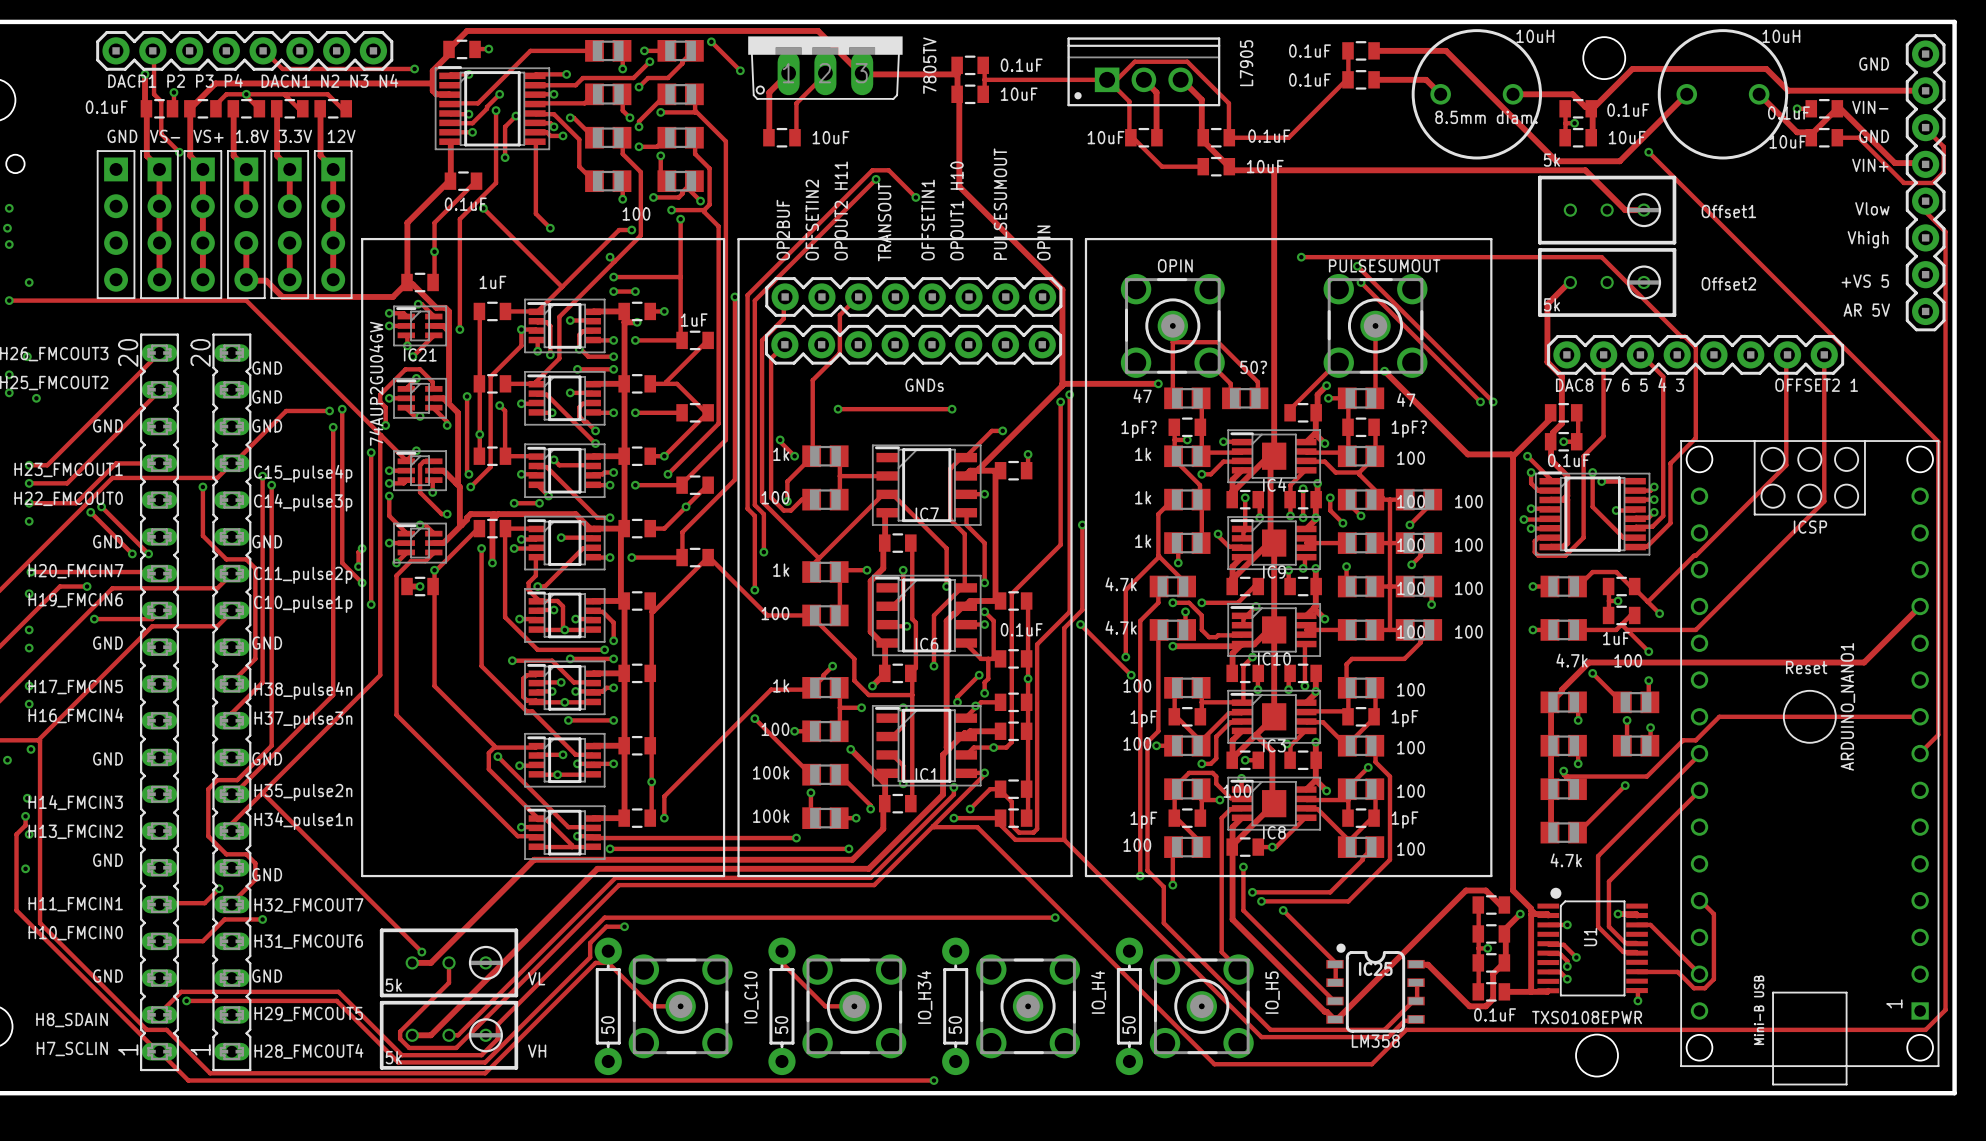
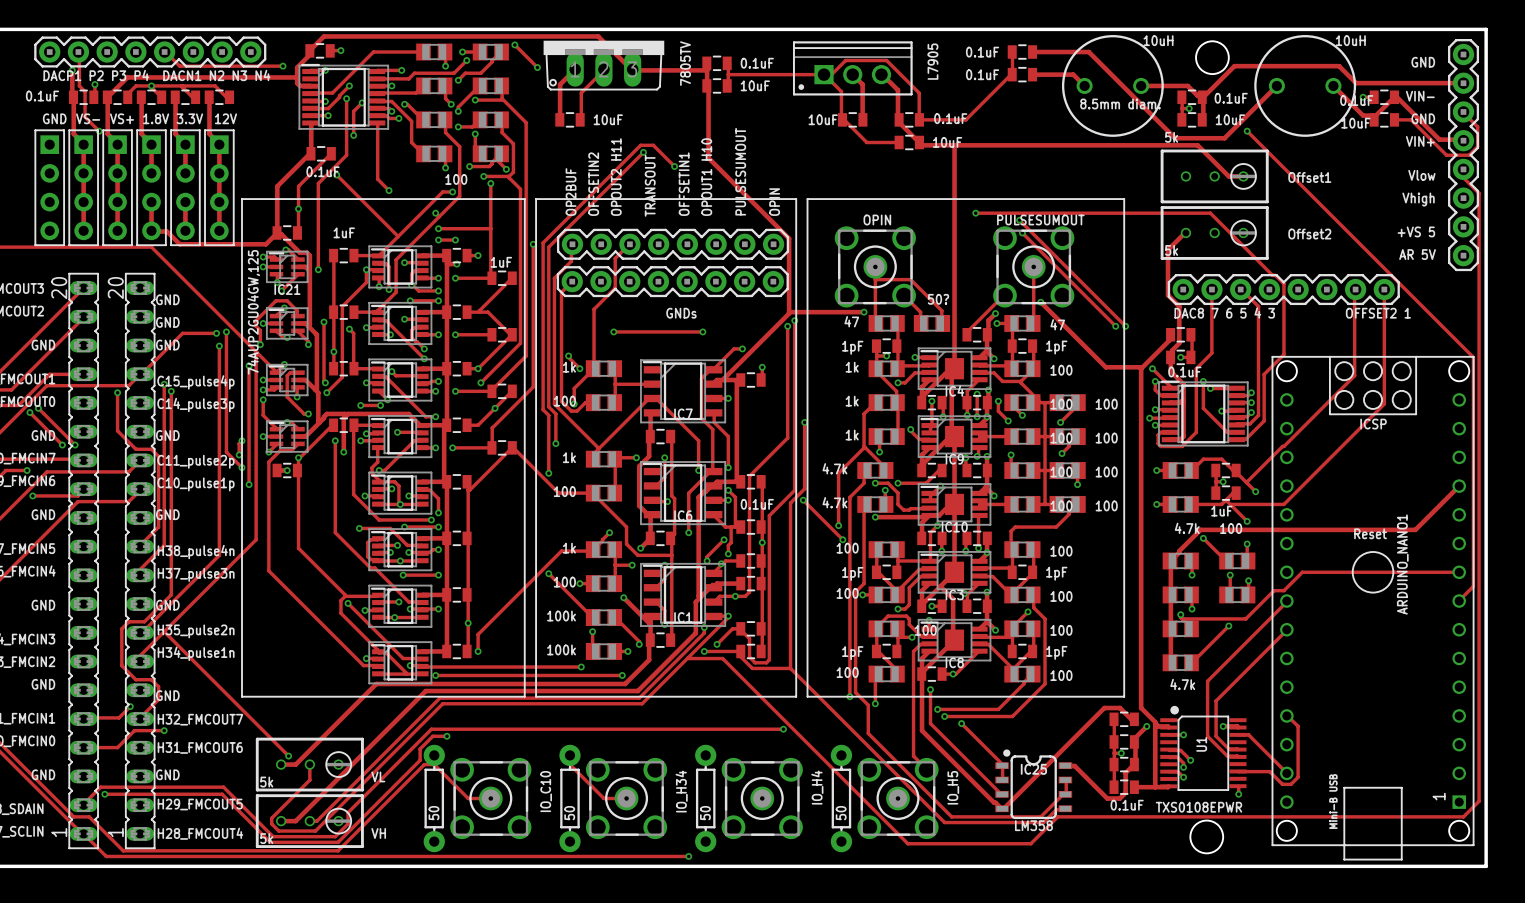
IC21 value: 74AUP2GU04GW (376, 383) -> 74AUP2GU04GW,125 (253, 312)
part value: 1pF? (1139, 429) -> 1pF (852, 347)
part value: 1pF? (1409, 429) -> 1pF (1056, 347)

